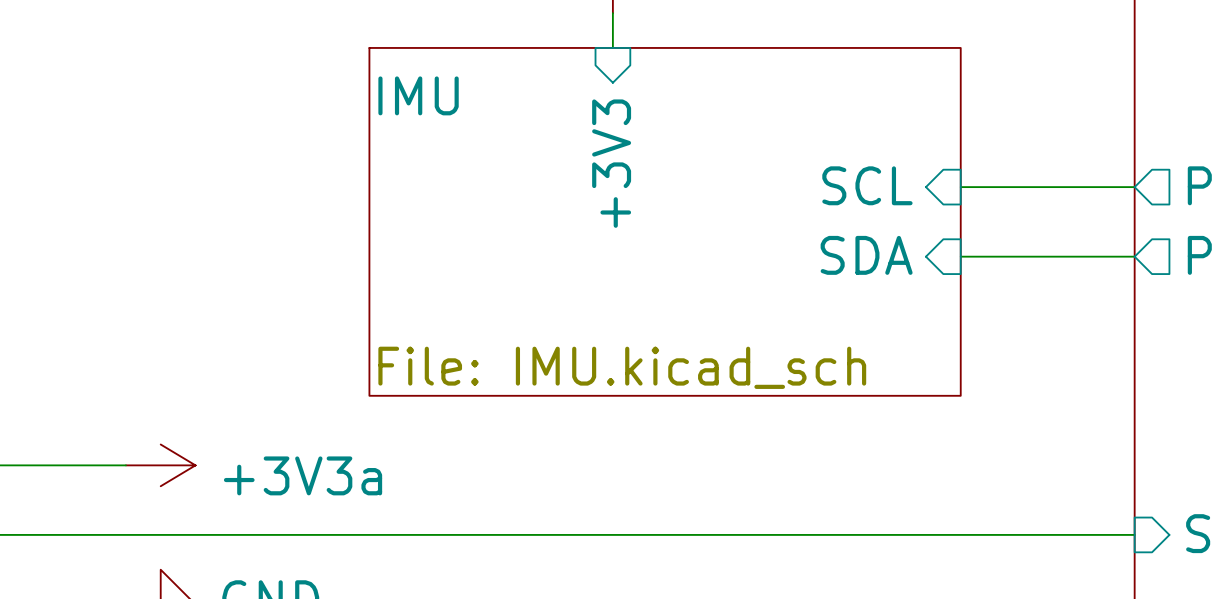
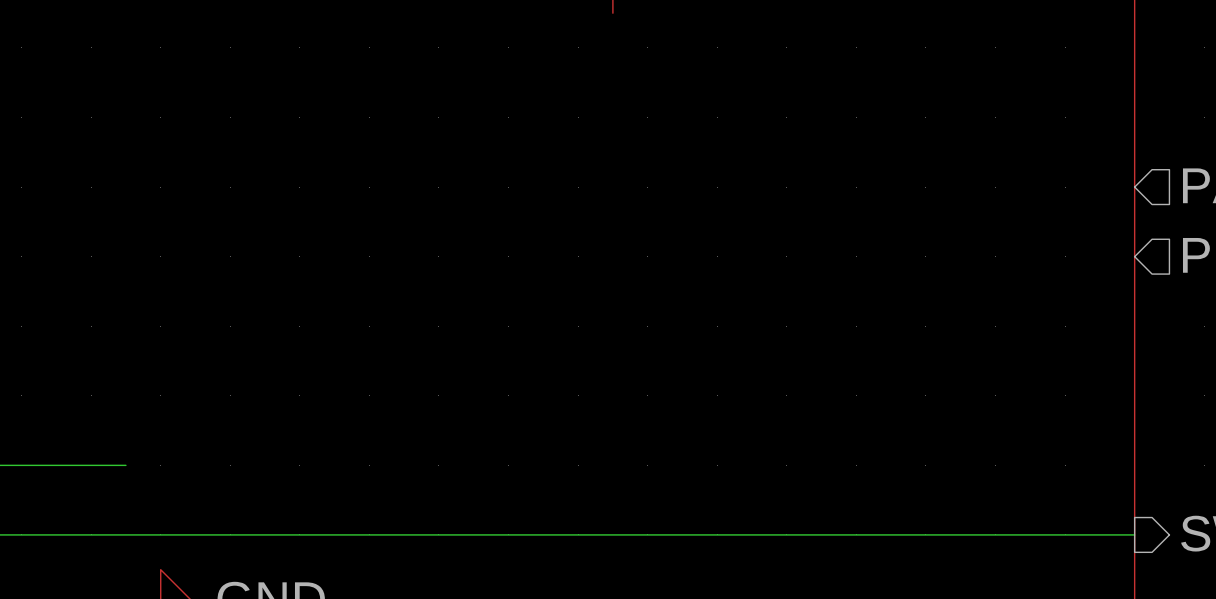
wire: (612, 13) (612, 47) -> none
sheet pin: +3V3 (611, 163) -> none
sheet pin: SCL (867, 185) -> none
wire: (960, 187) (1134, 187) -> none
sheet IMU: File: IMU.kicad_sch (665, 221) -> none
sheet pin: SDA (866, 255) -> none
wire: (960, 256) (1134, 256) -> none
power symbol: +3V3a (160, 465) -> none

